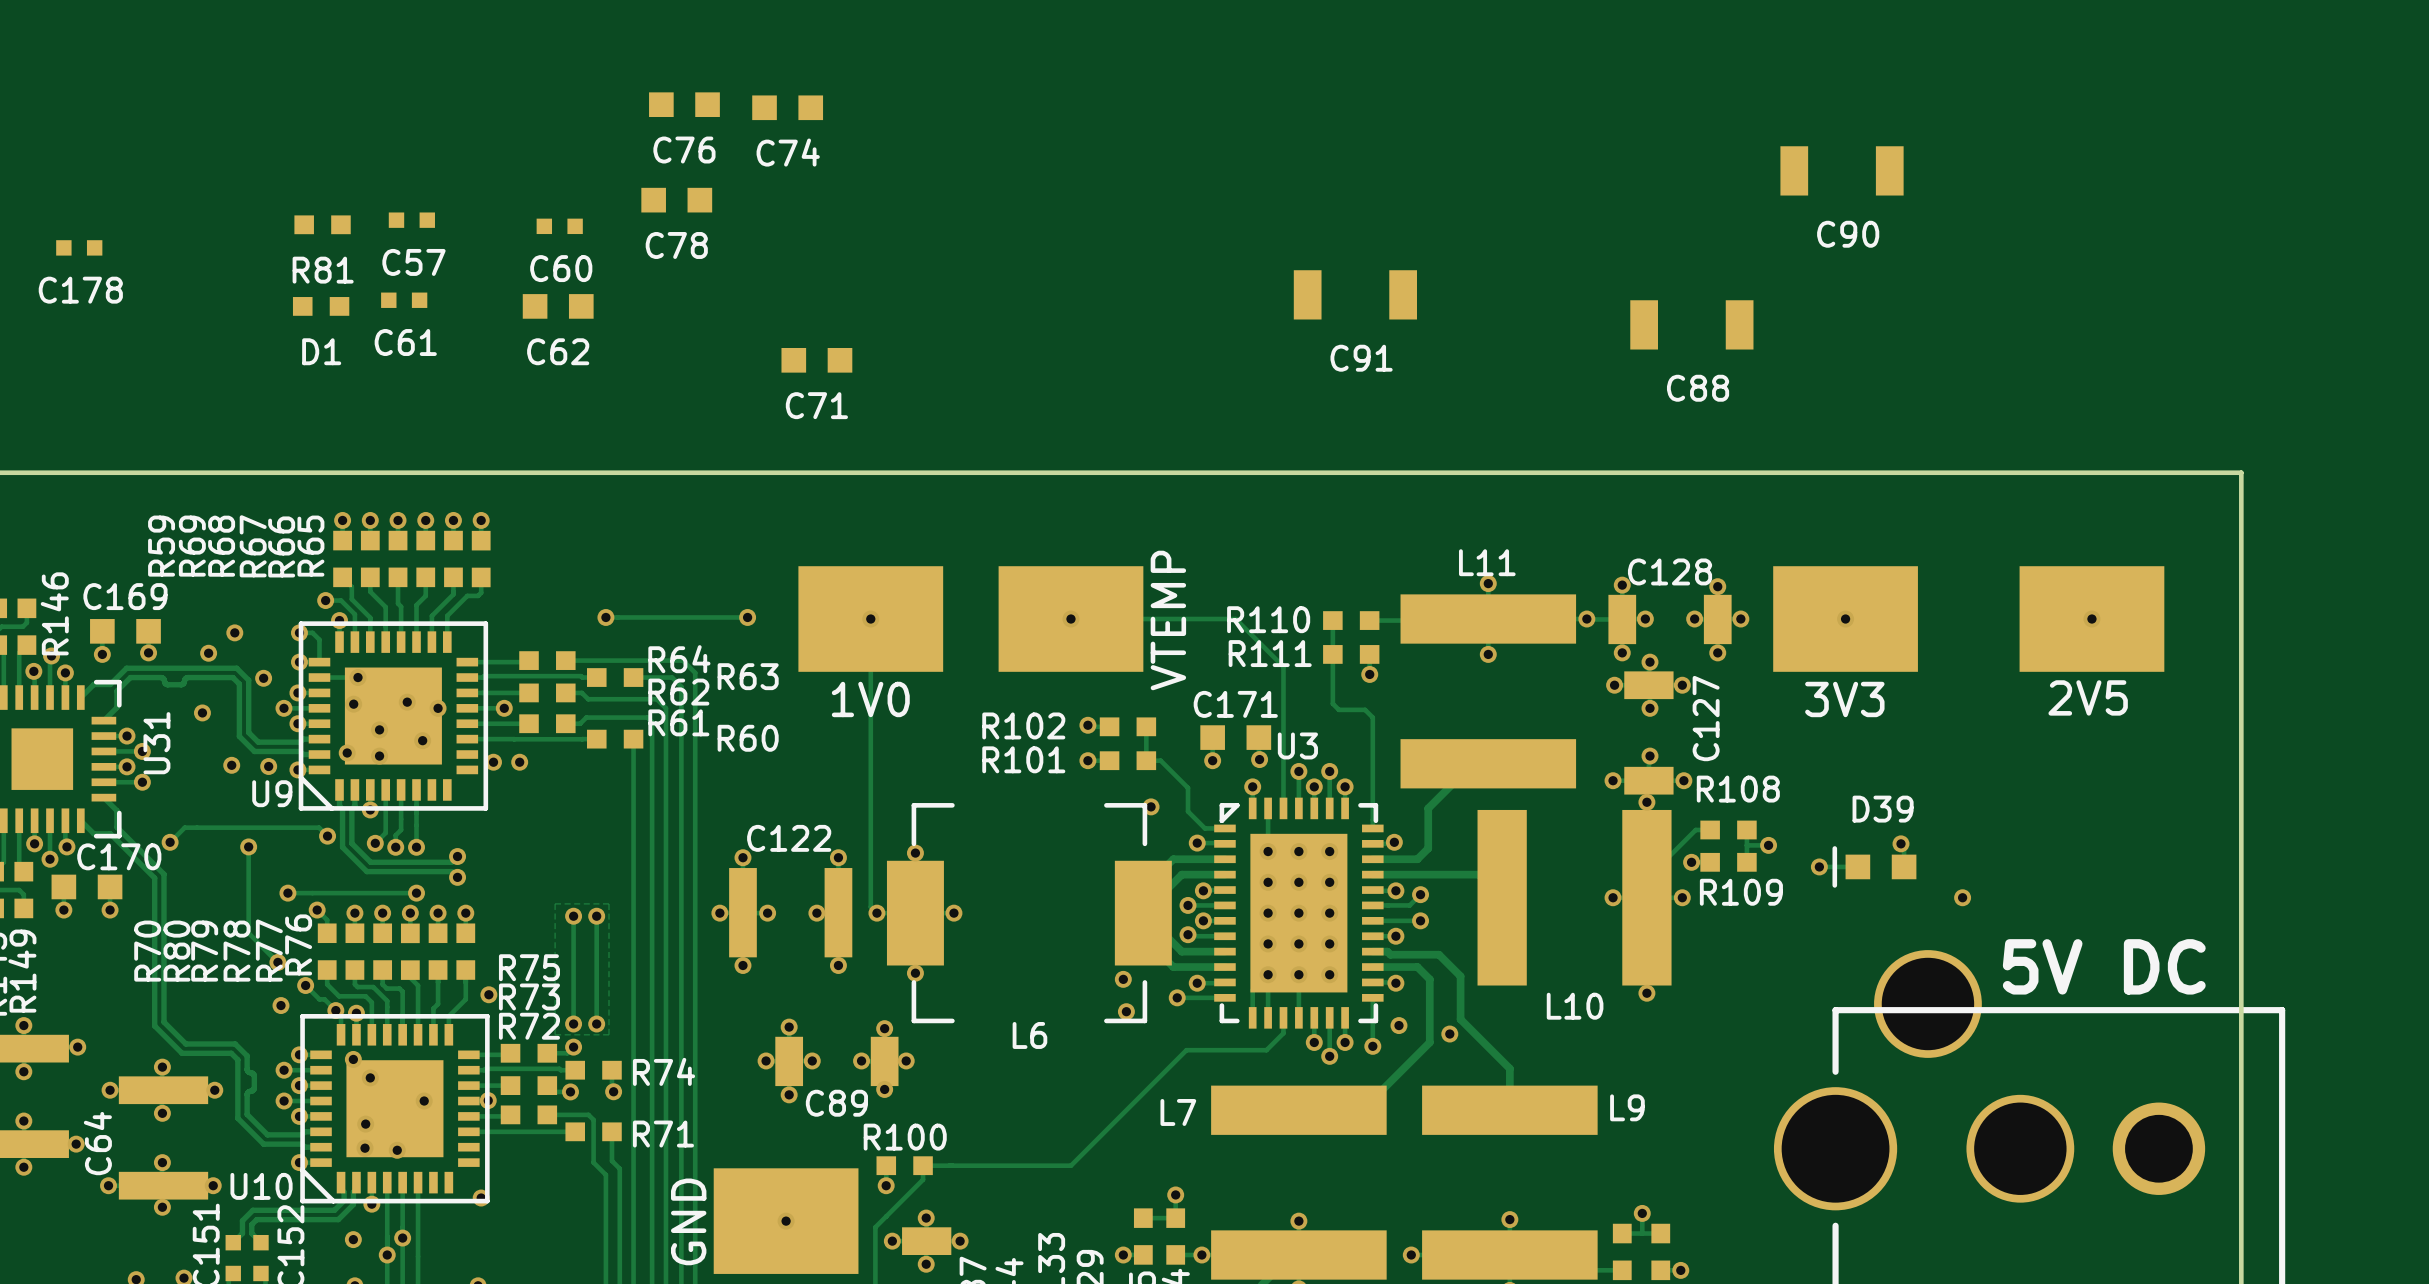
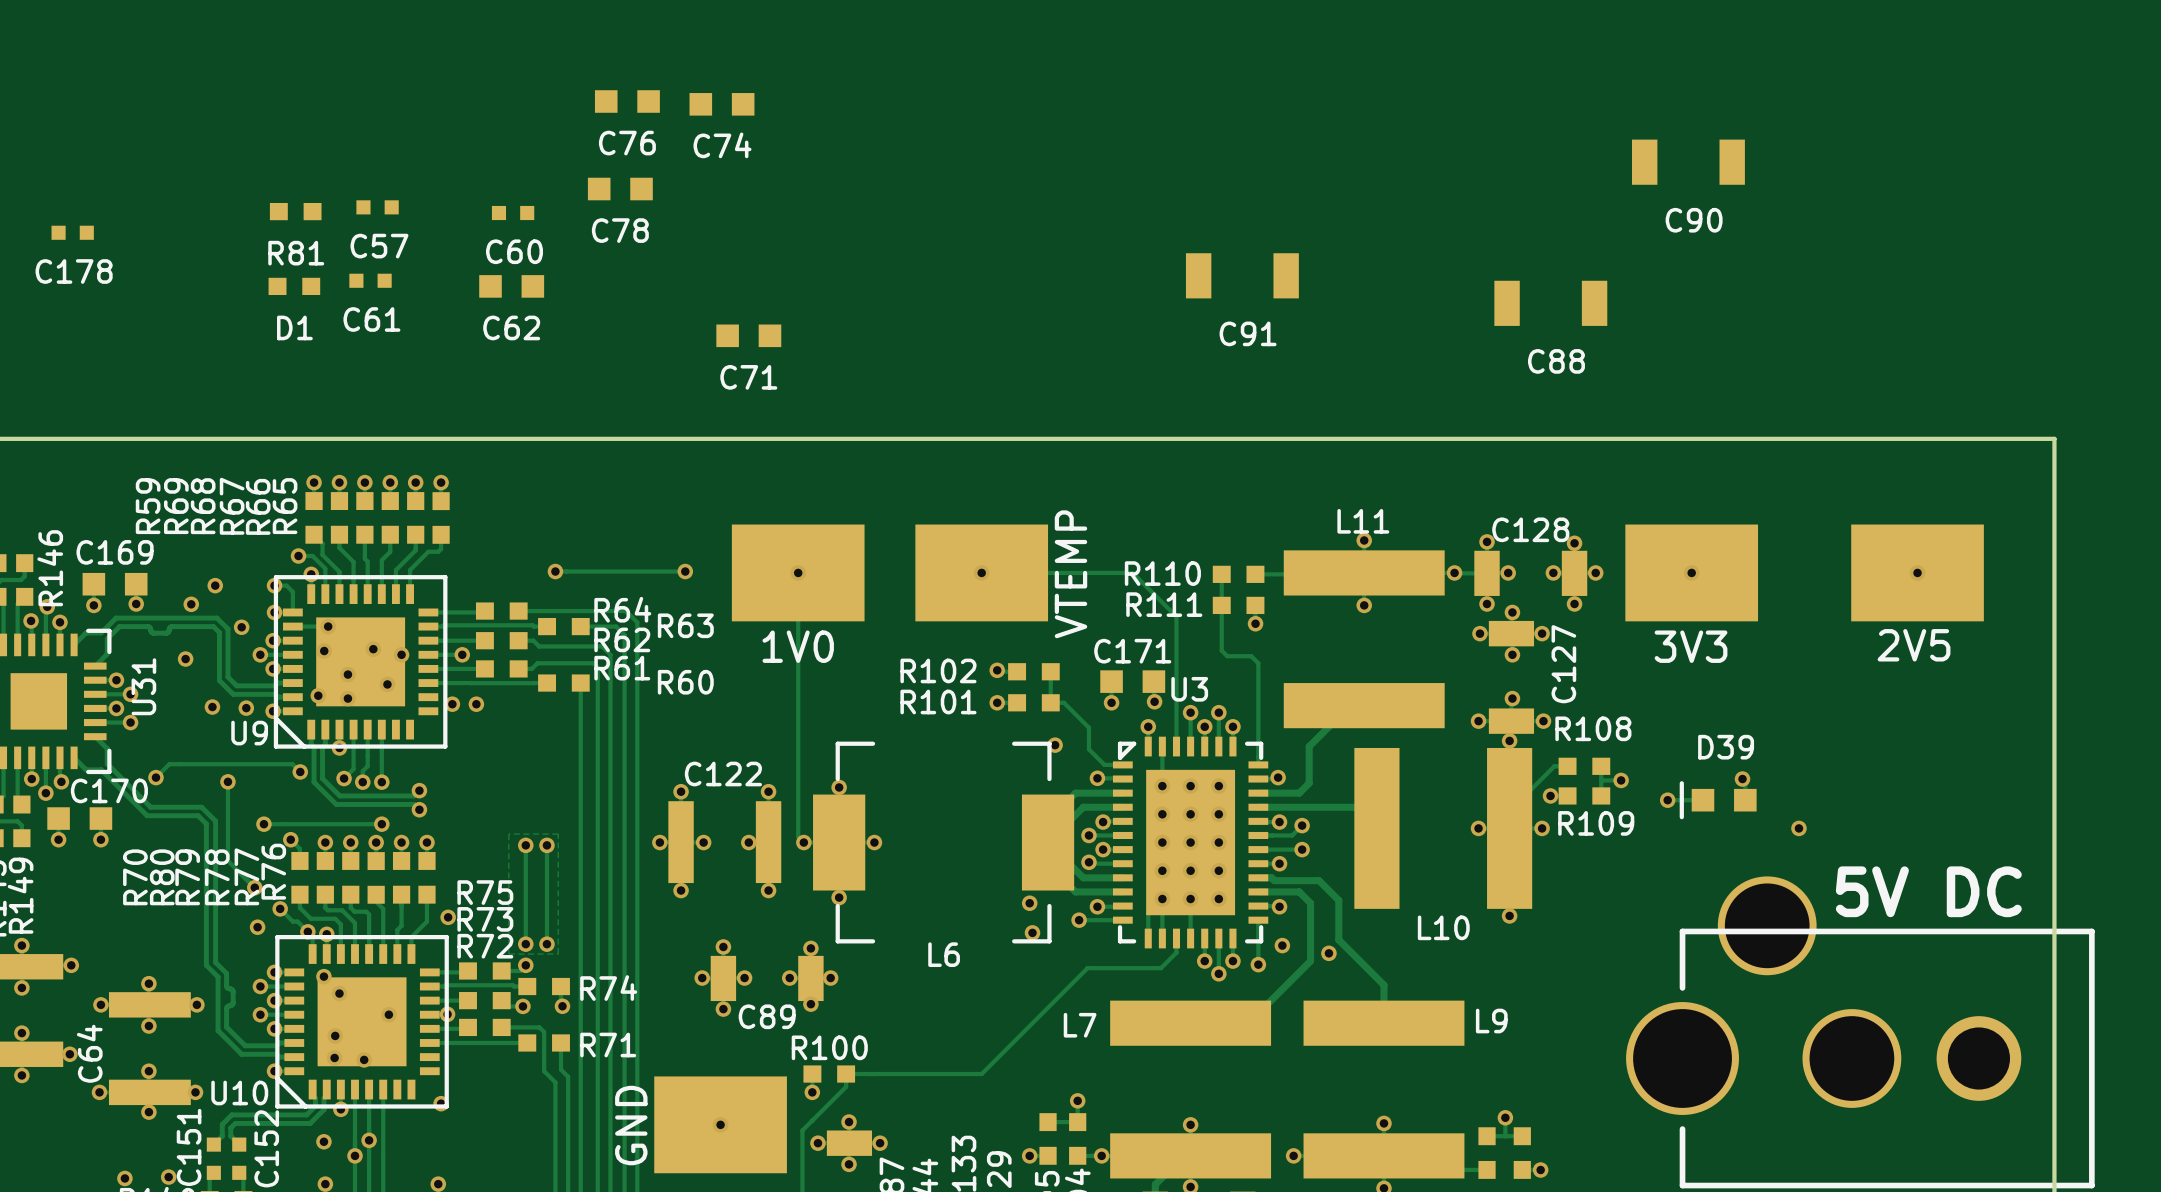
track: (163, 874) (163, 1022) (185, 1044) (235, 1044) -> (150, 807) (201, 807) (215, 821) (215, 962)
track: (154, 878) (154, 1025) (182, 1053) (231, 1053) -> (141, 810) (147, 815) (198, 815) (206, 823) (206, 965) (212, 971)

